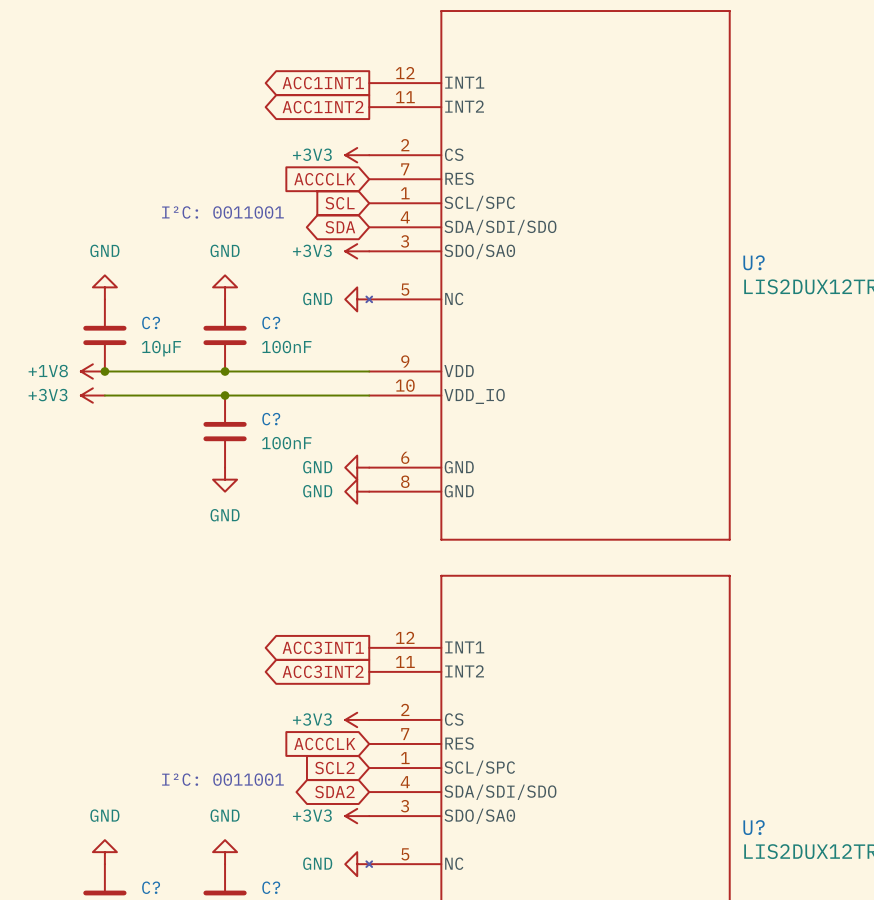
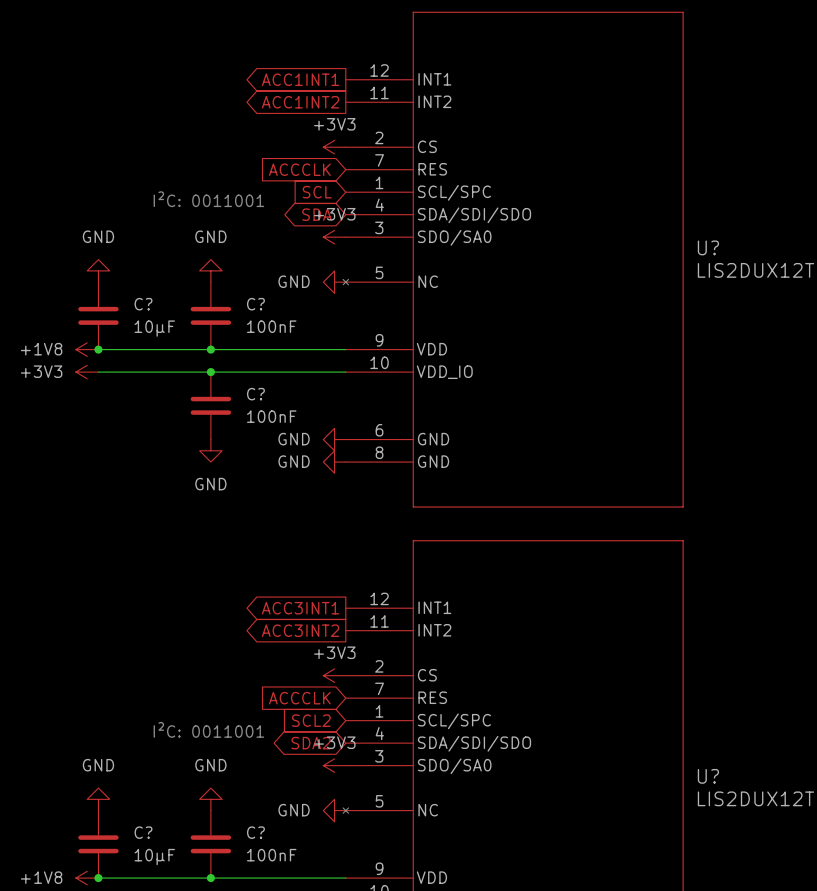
power symbol text position: +3V3 (312, 154) -> +3V3 (334, 124)
power symbol text position: +3V3 (312, 250) -> +3V3 (334, 214)
power symbol text position: +3V3 (312, 719) -> +3V3 (334, 652)
power symbol text position: +3V3 (312, 815) -> +3V3 (334, 742)

